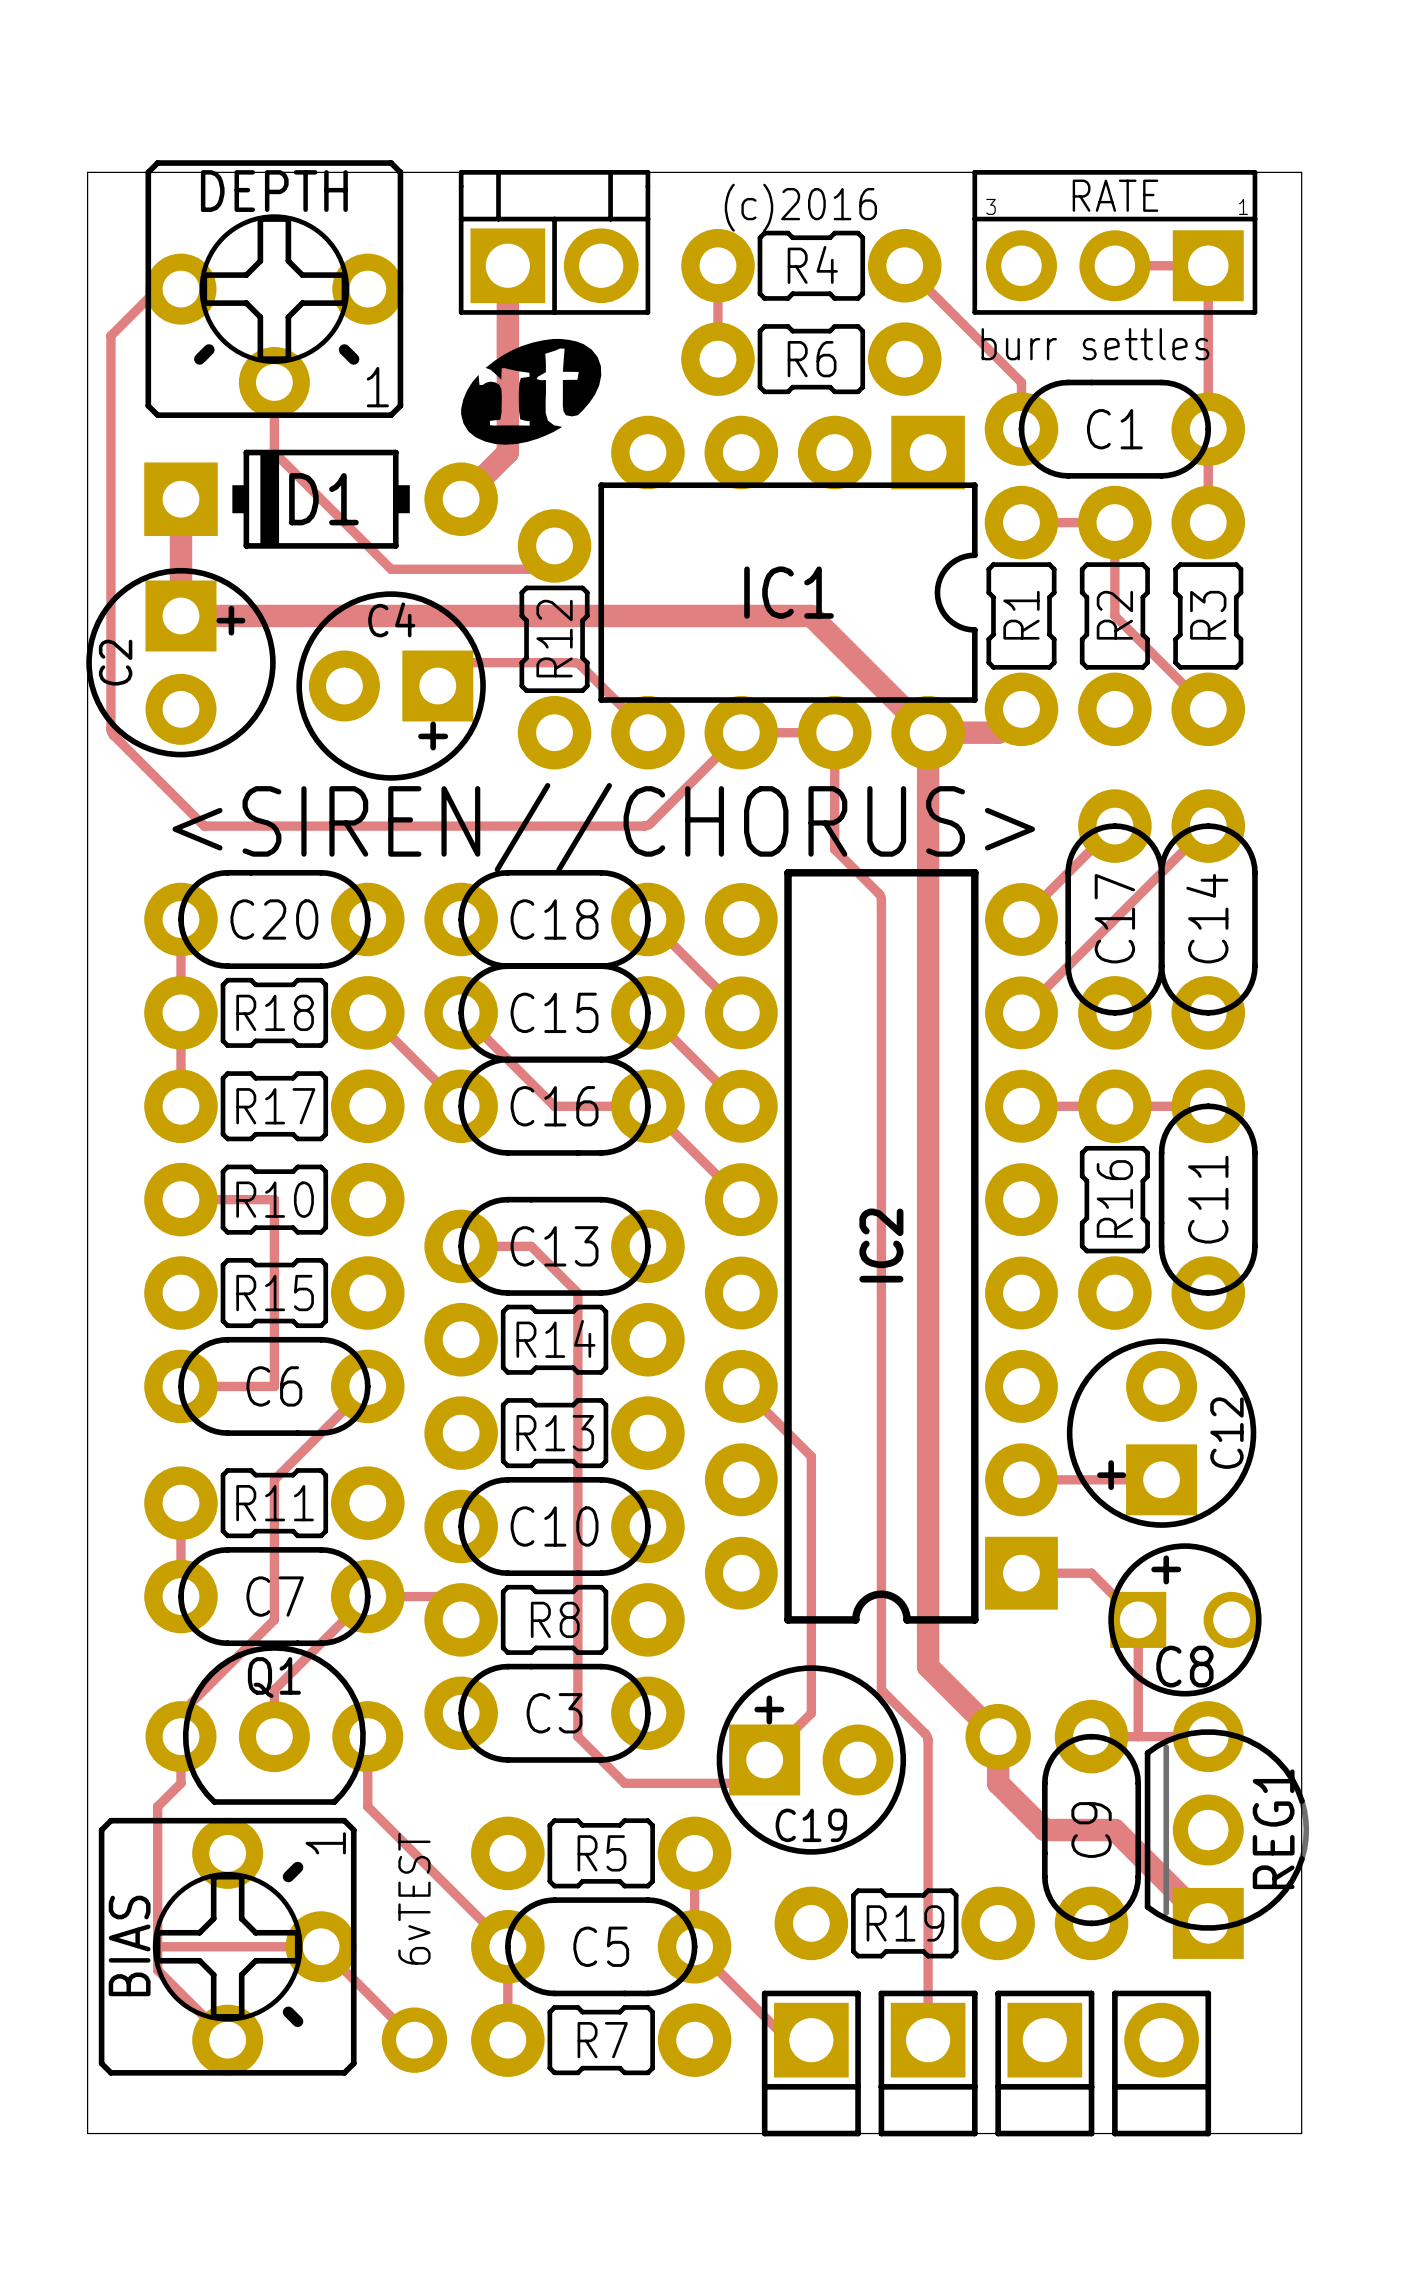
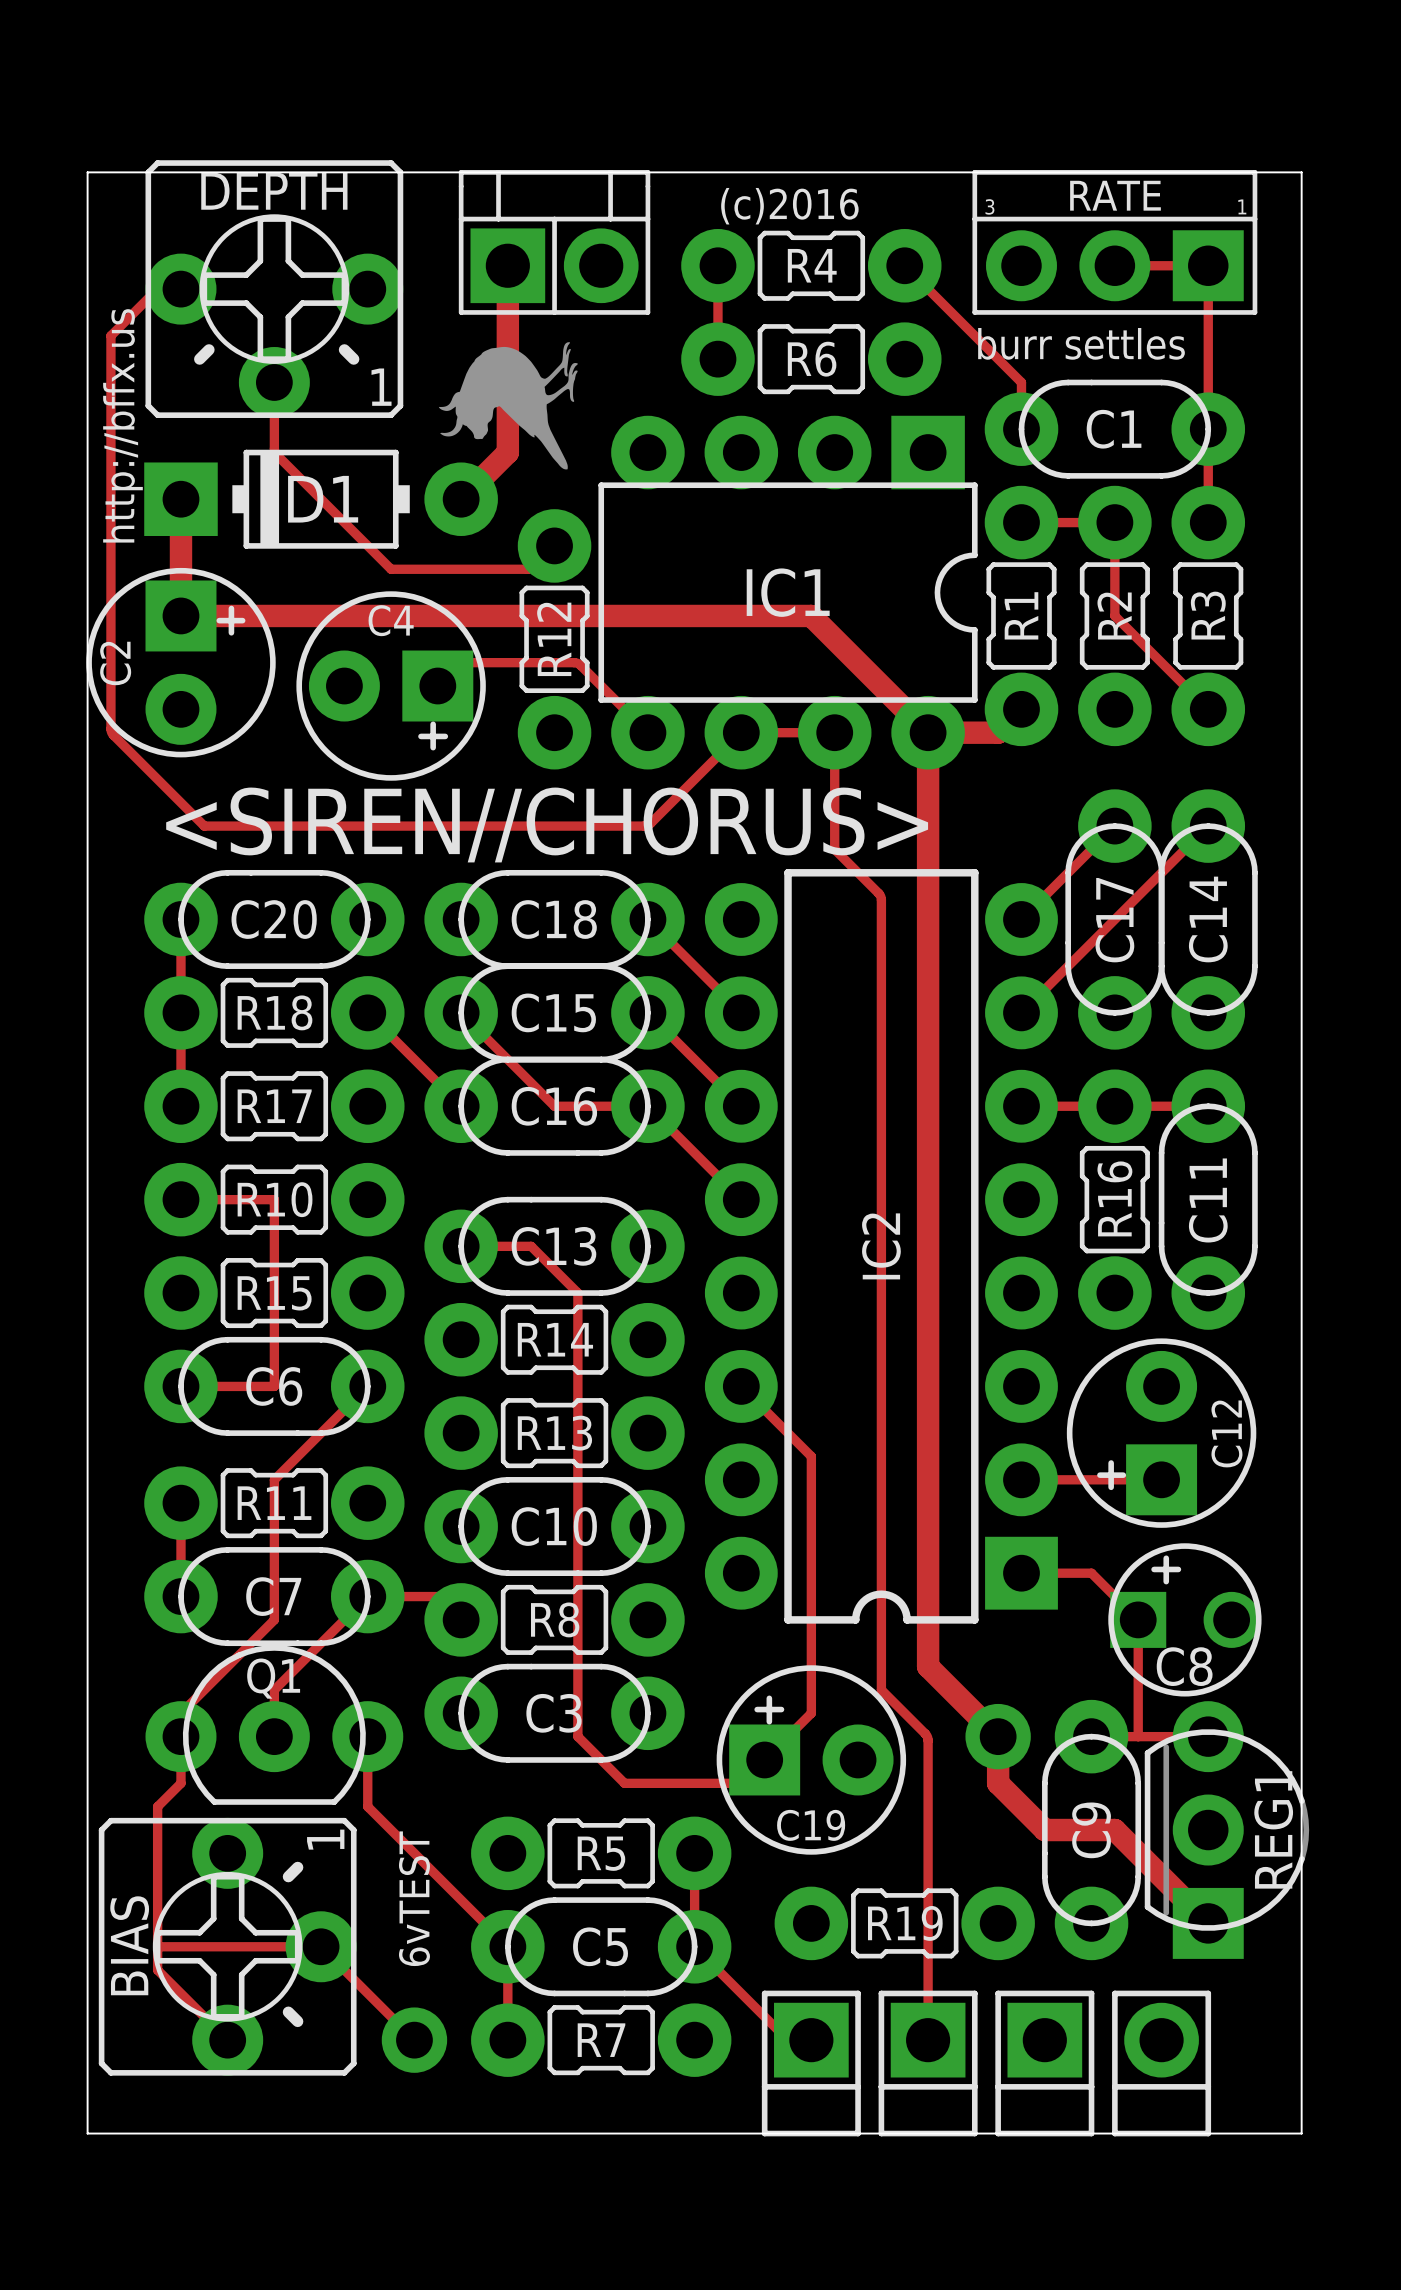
drawing shape: [461, 338, 602, 445] -> [437, 342, 578, 470]
text: none -> http://bffx.us (122, 425)

